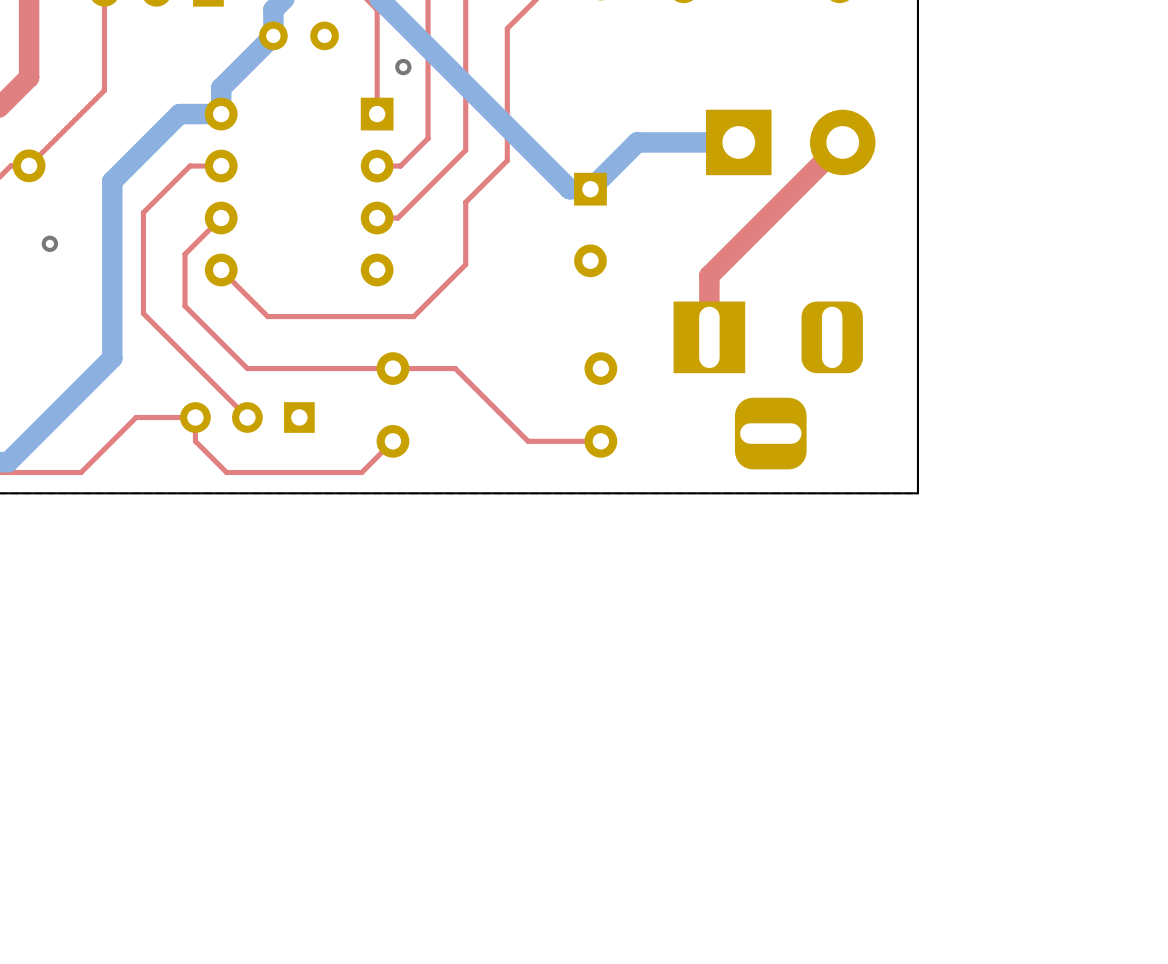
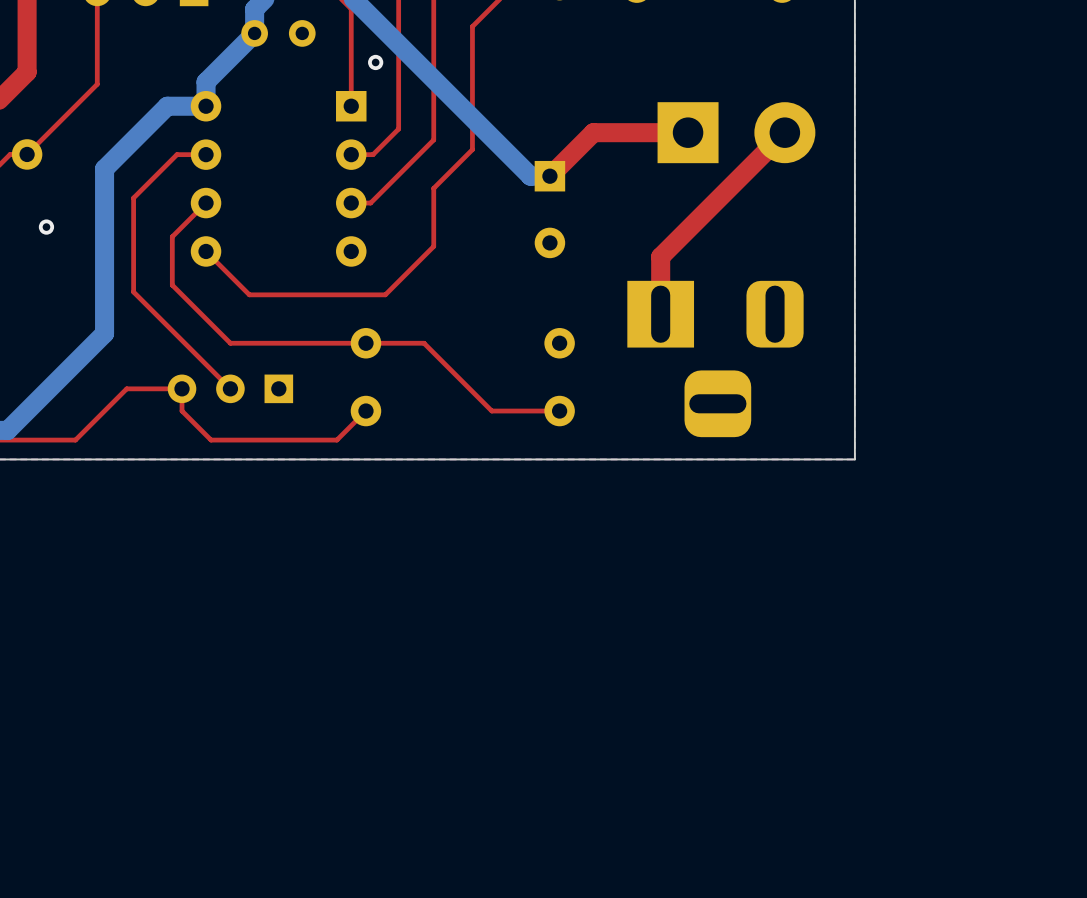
bottom track: (738, 142) (637, 142) (590, 189) -> none
top track: none -> (688, 132) (593, 132) (549, 176)

